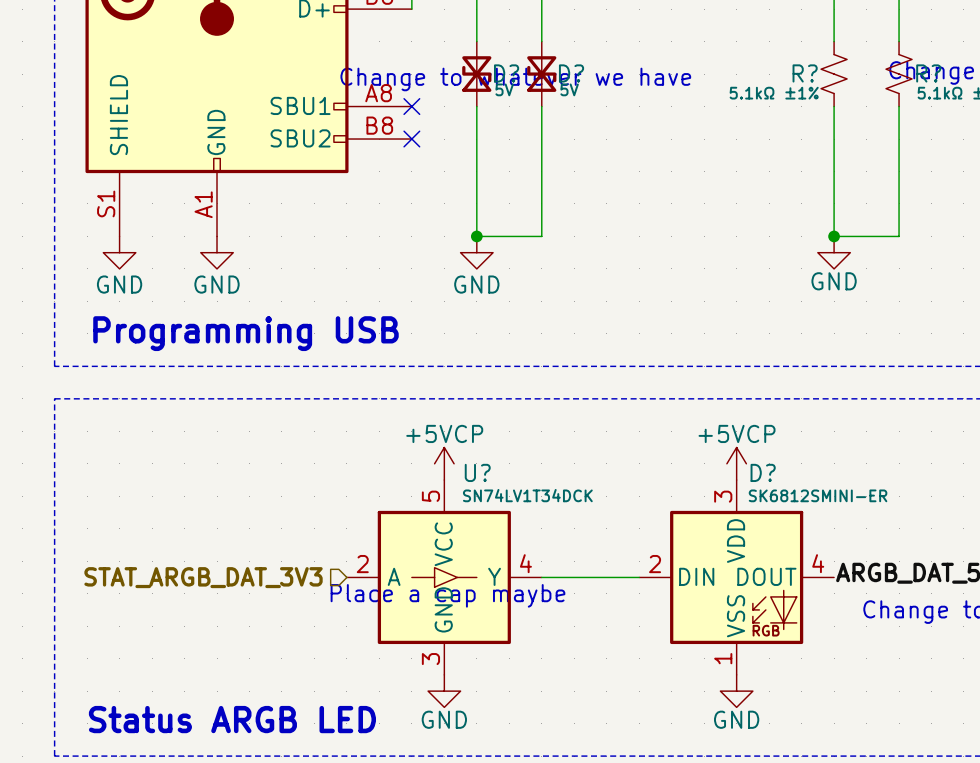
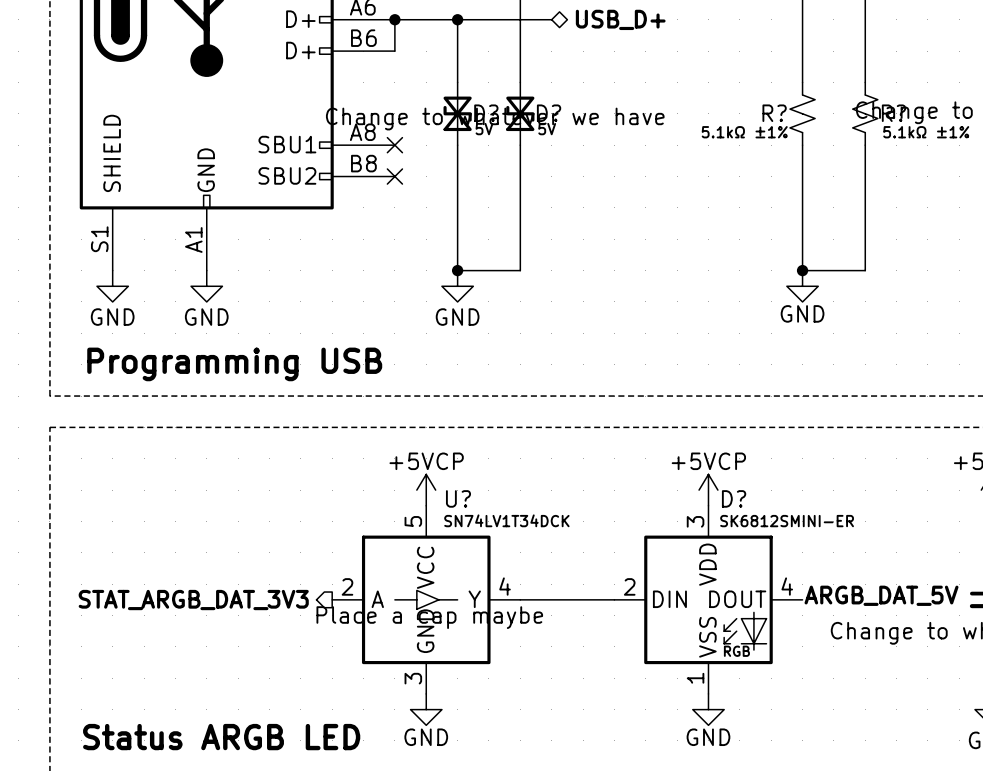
hierarchical label shape: input (203, 577) -> output (193, 600)

